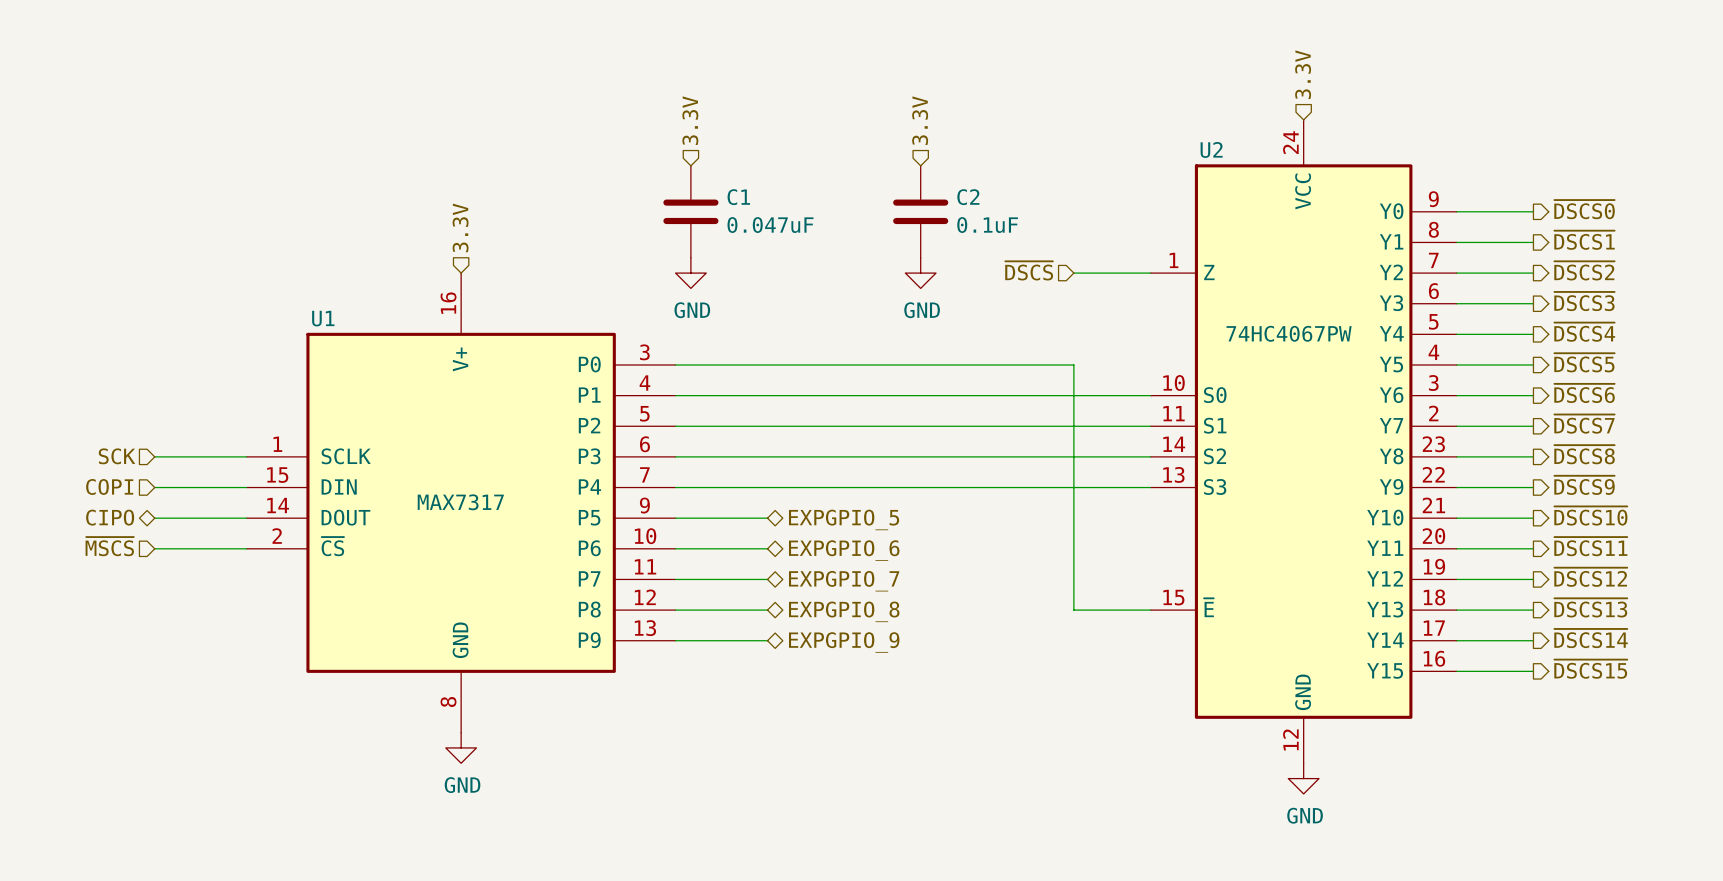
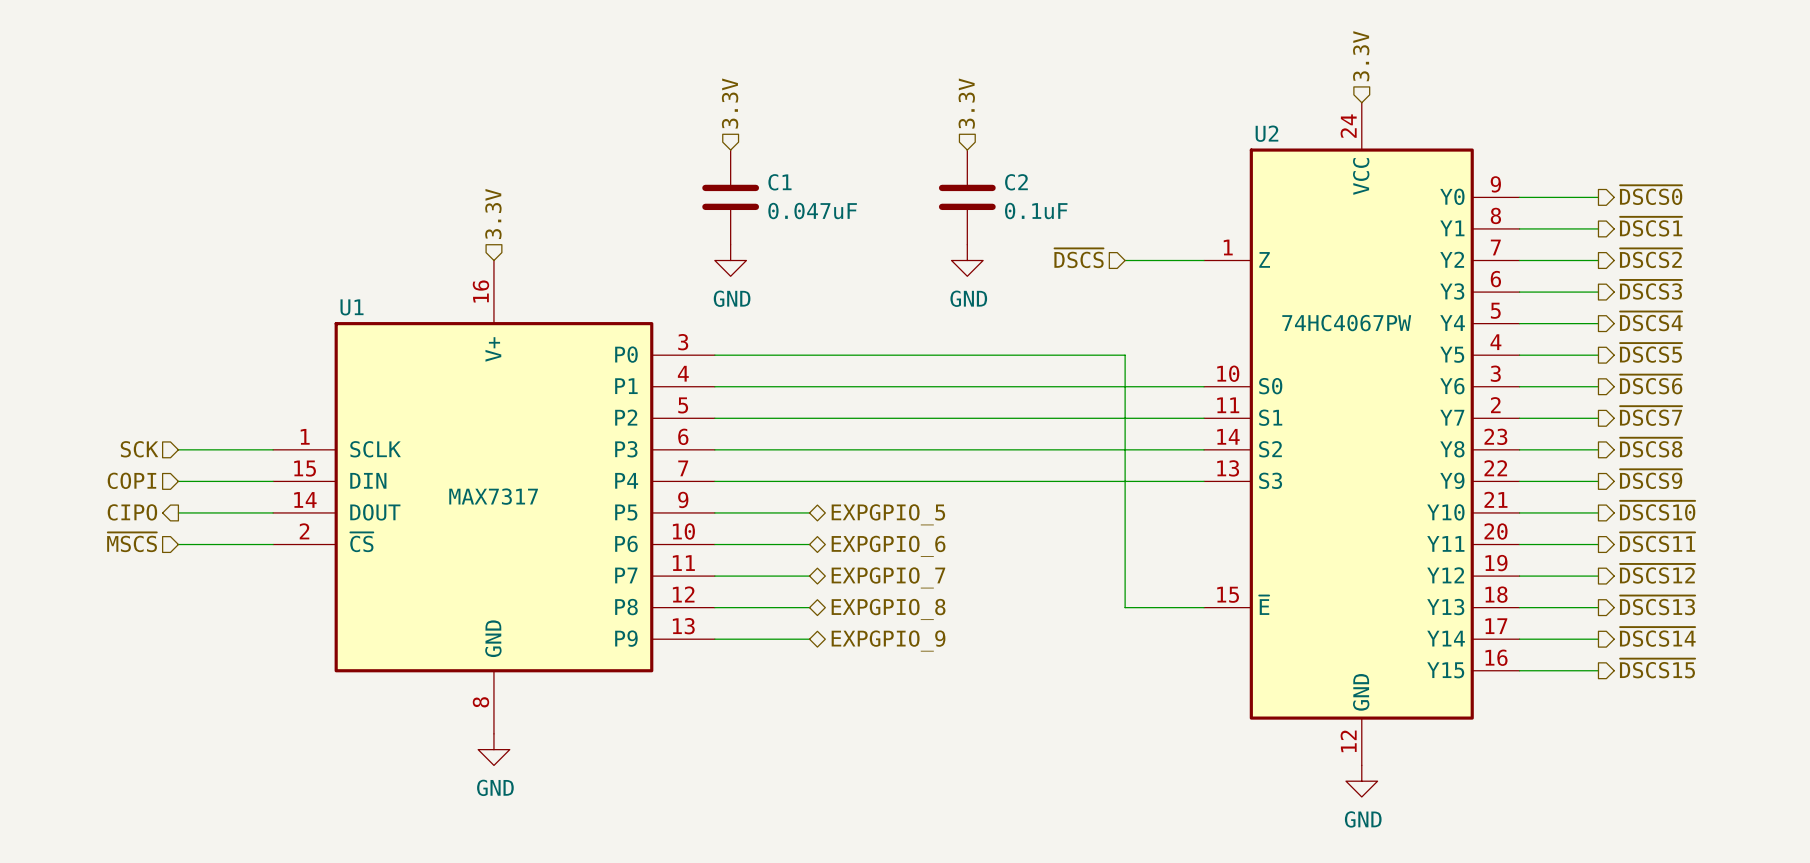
hierarchical label shape: bidirectional (110, 517) -> output (132, 512)

